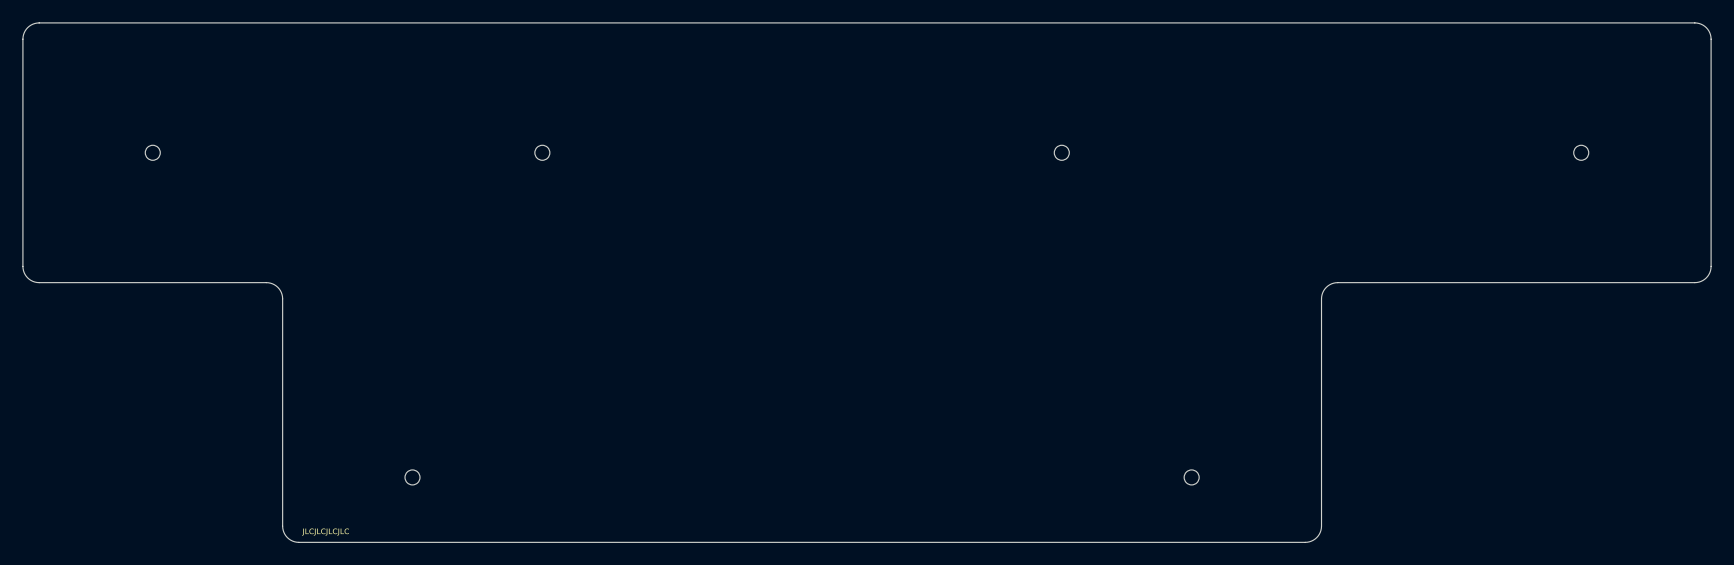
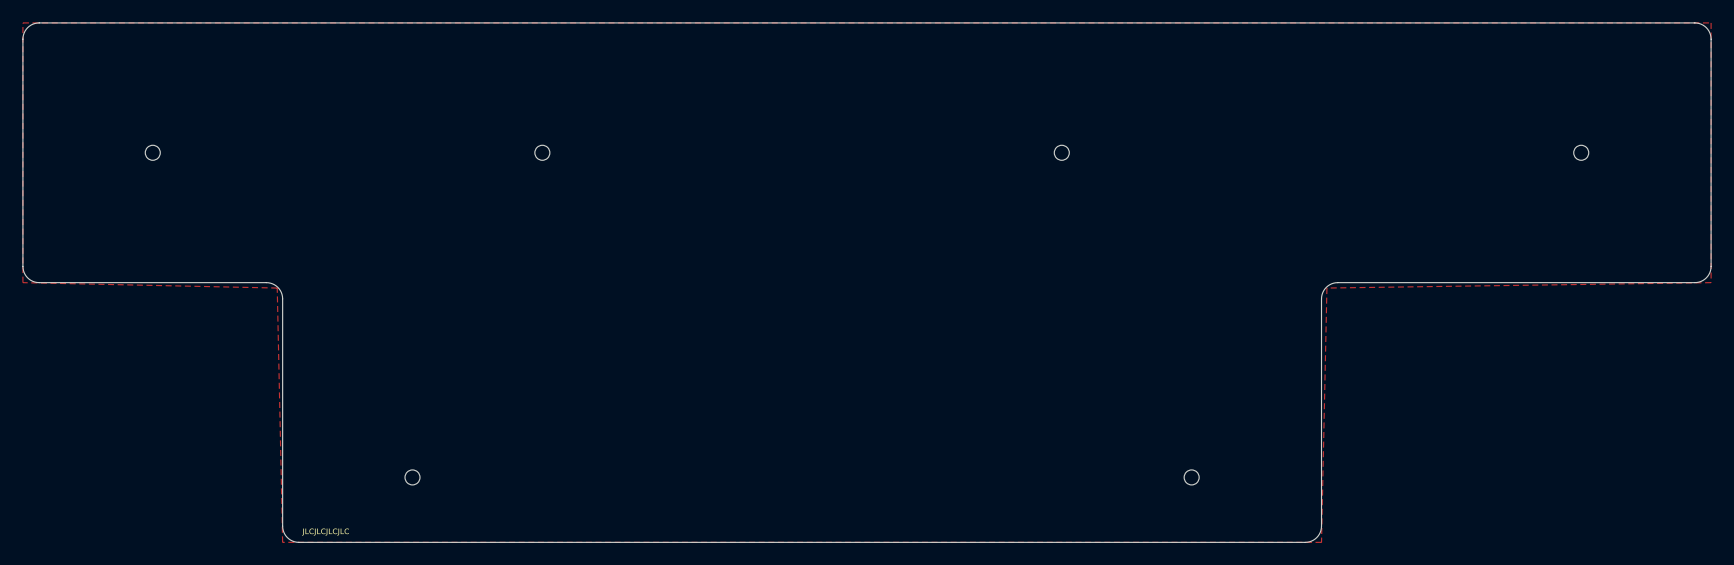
zone outline: none -> (22, 22) (22, 282) (277, 288) (282, 542) (1321, 542) (1326, 288) (1711, 282) (1711, 22) (22, 22)

